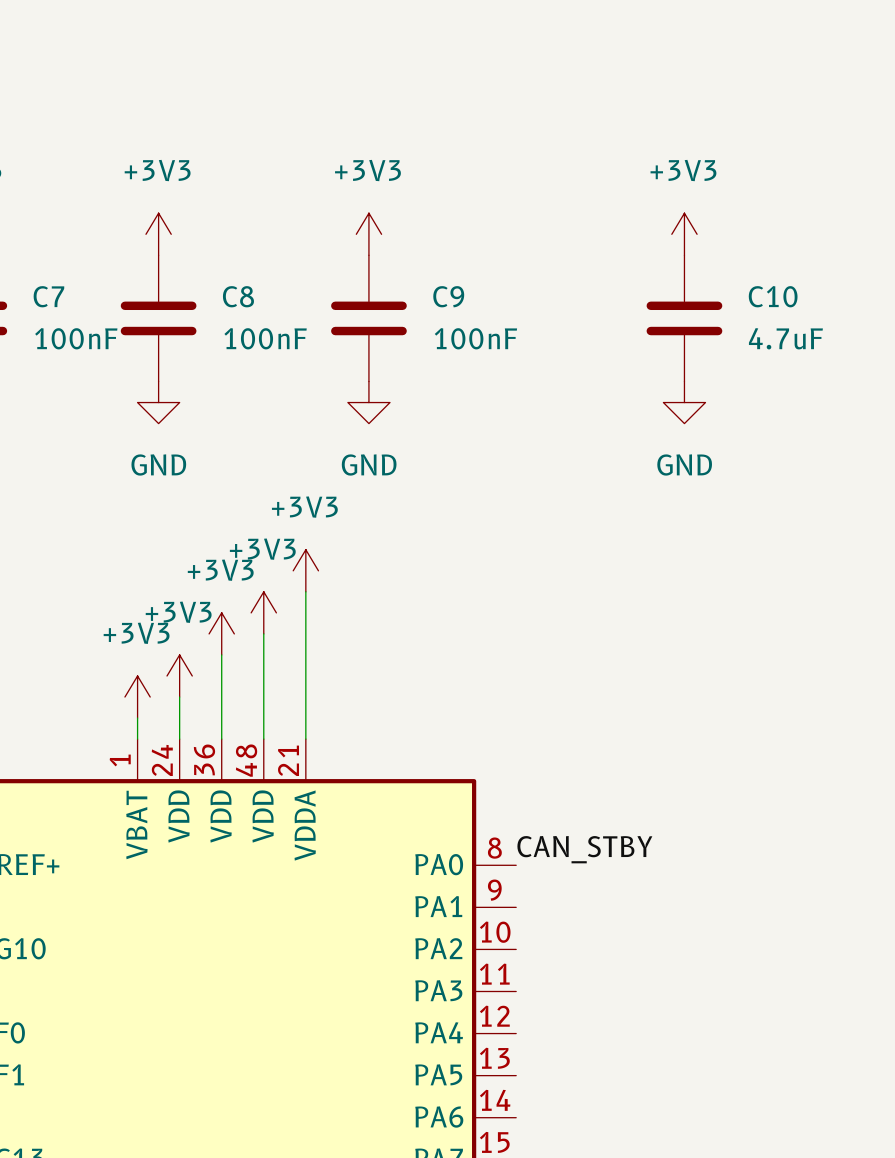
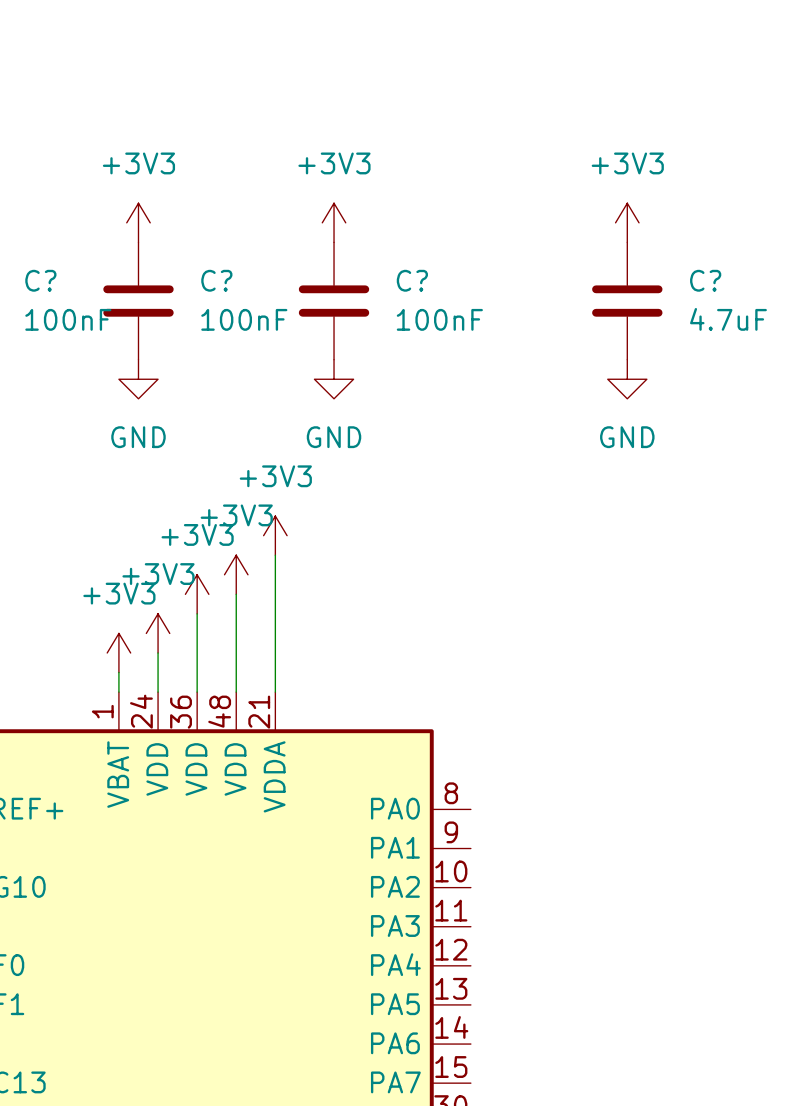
C7 name: C7 (48, 296) -> C? (40, 280)
C8 name: C8 (238, 296) -> C? (216, 280)
C9 name: C9 (448, 296) -> C? (412, 280)
C10 name: C10 (773, 296) -> C? (705, 280)
label: CAN_STBY (584, 849) -> none

